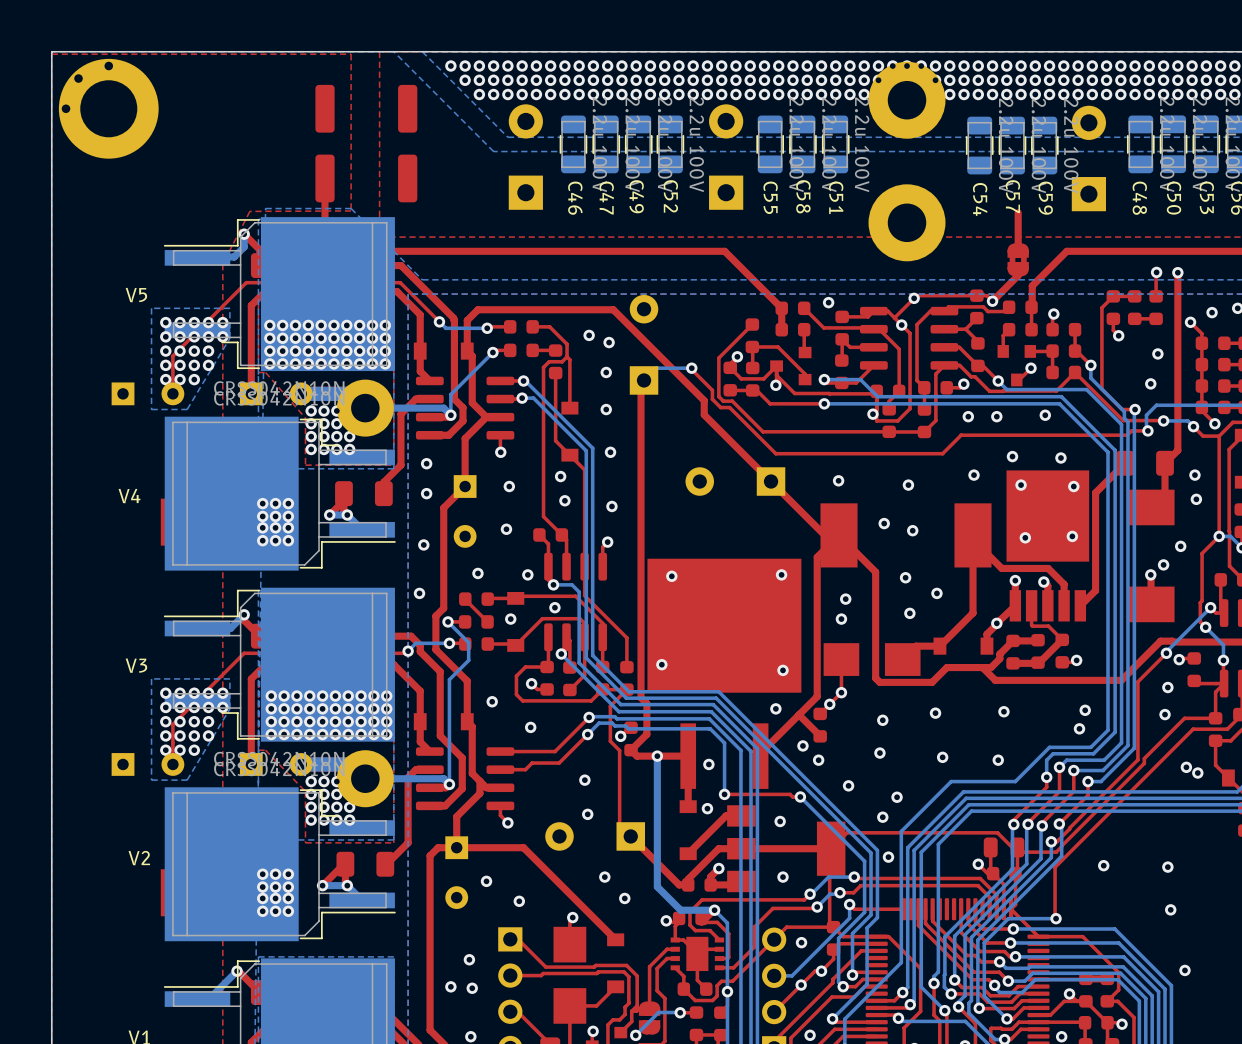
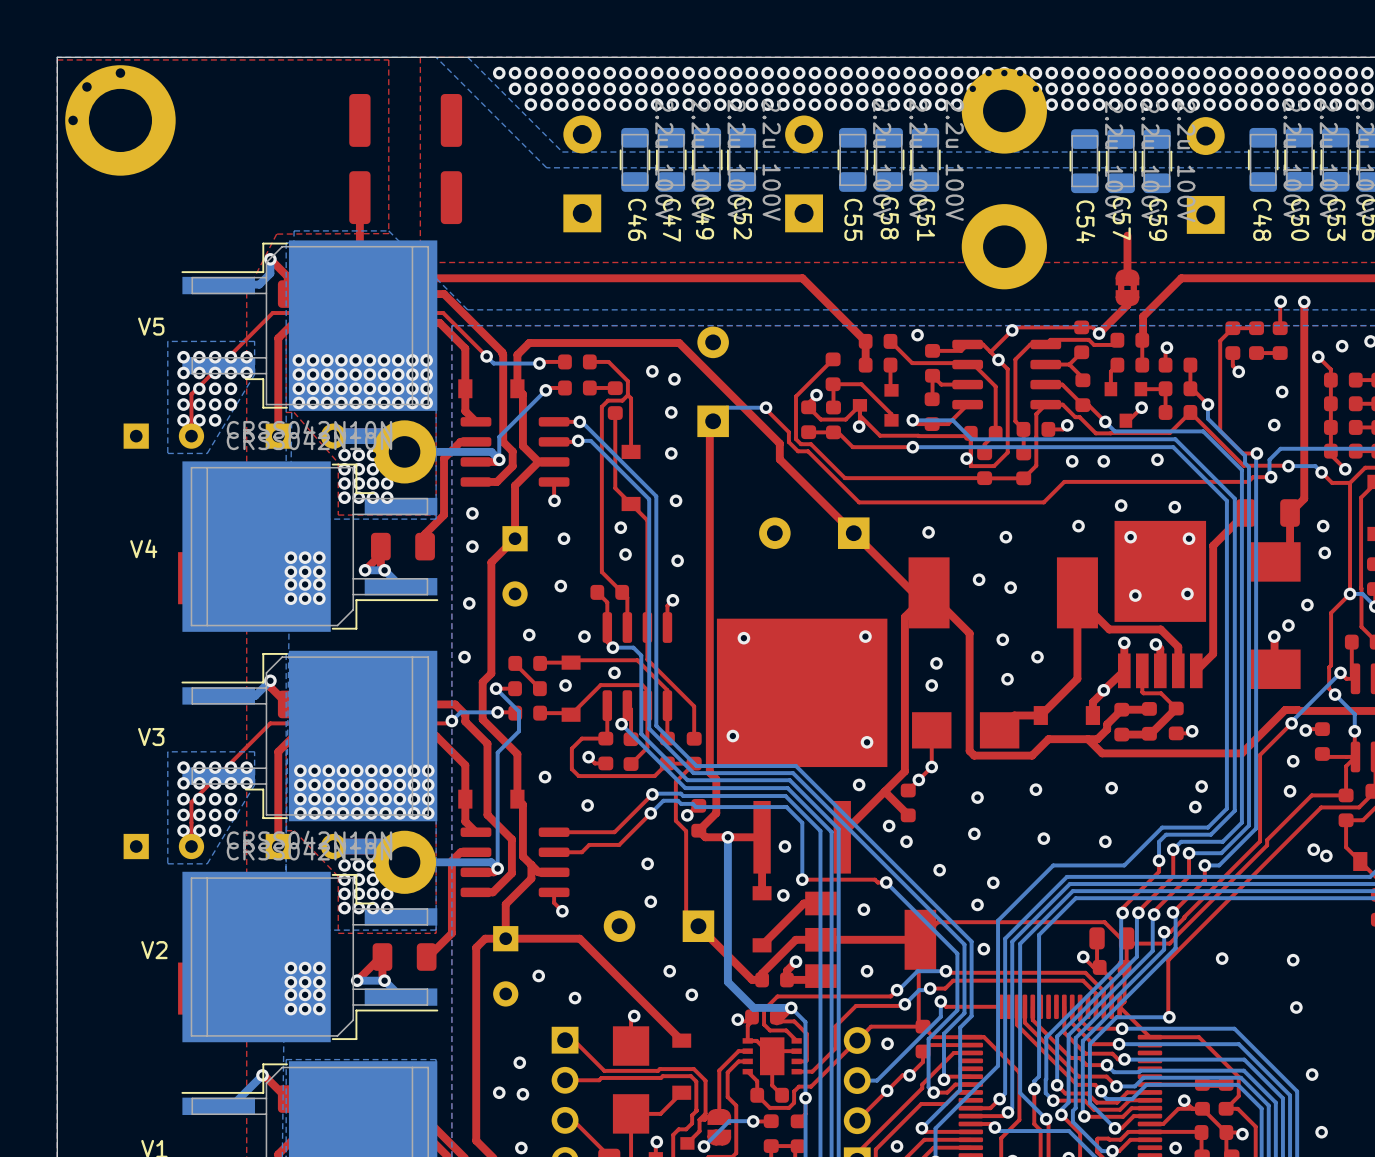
via: none -> (1321, 1132)

